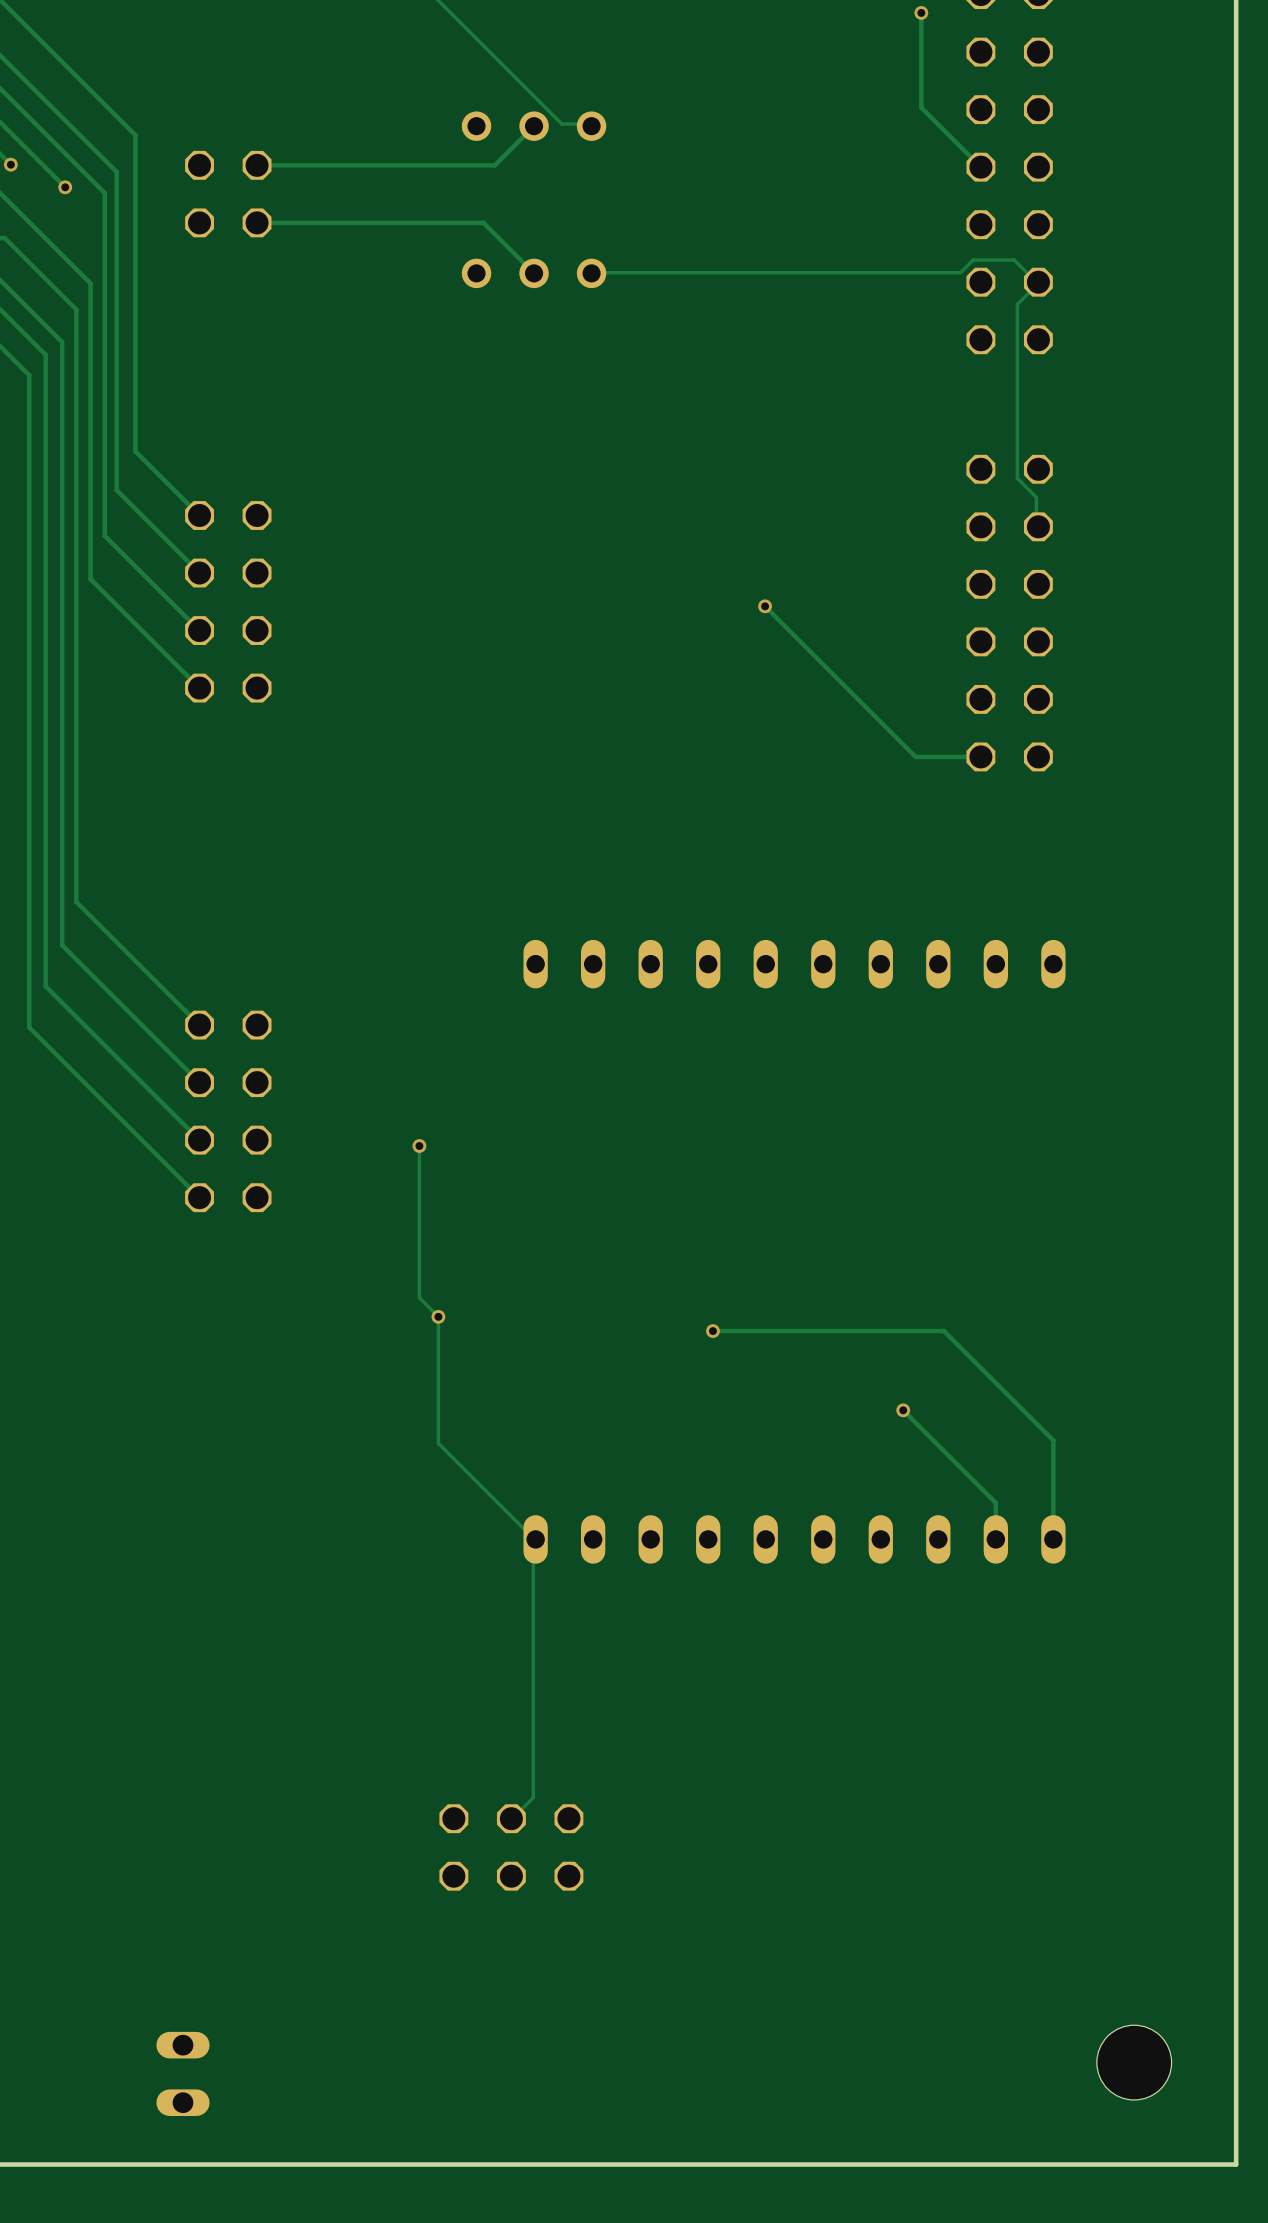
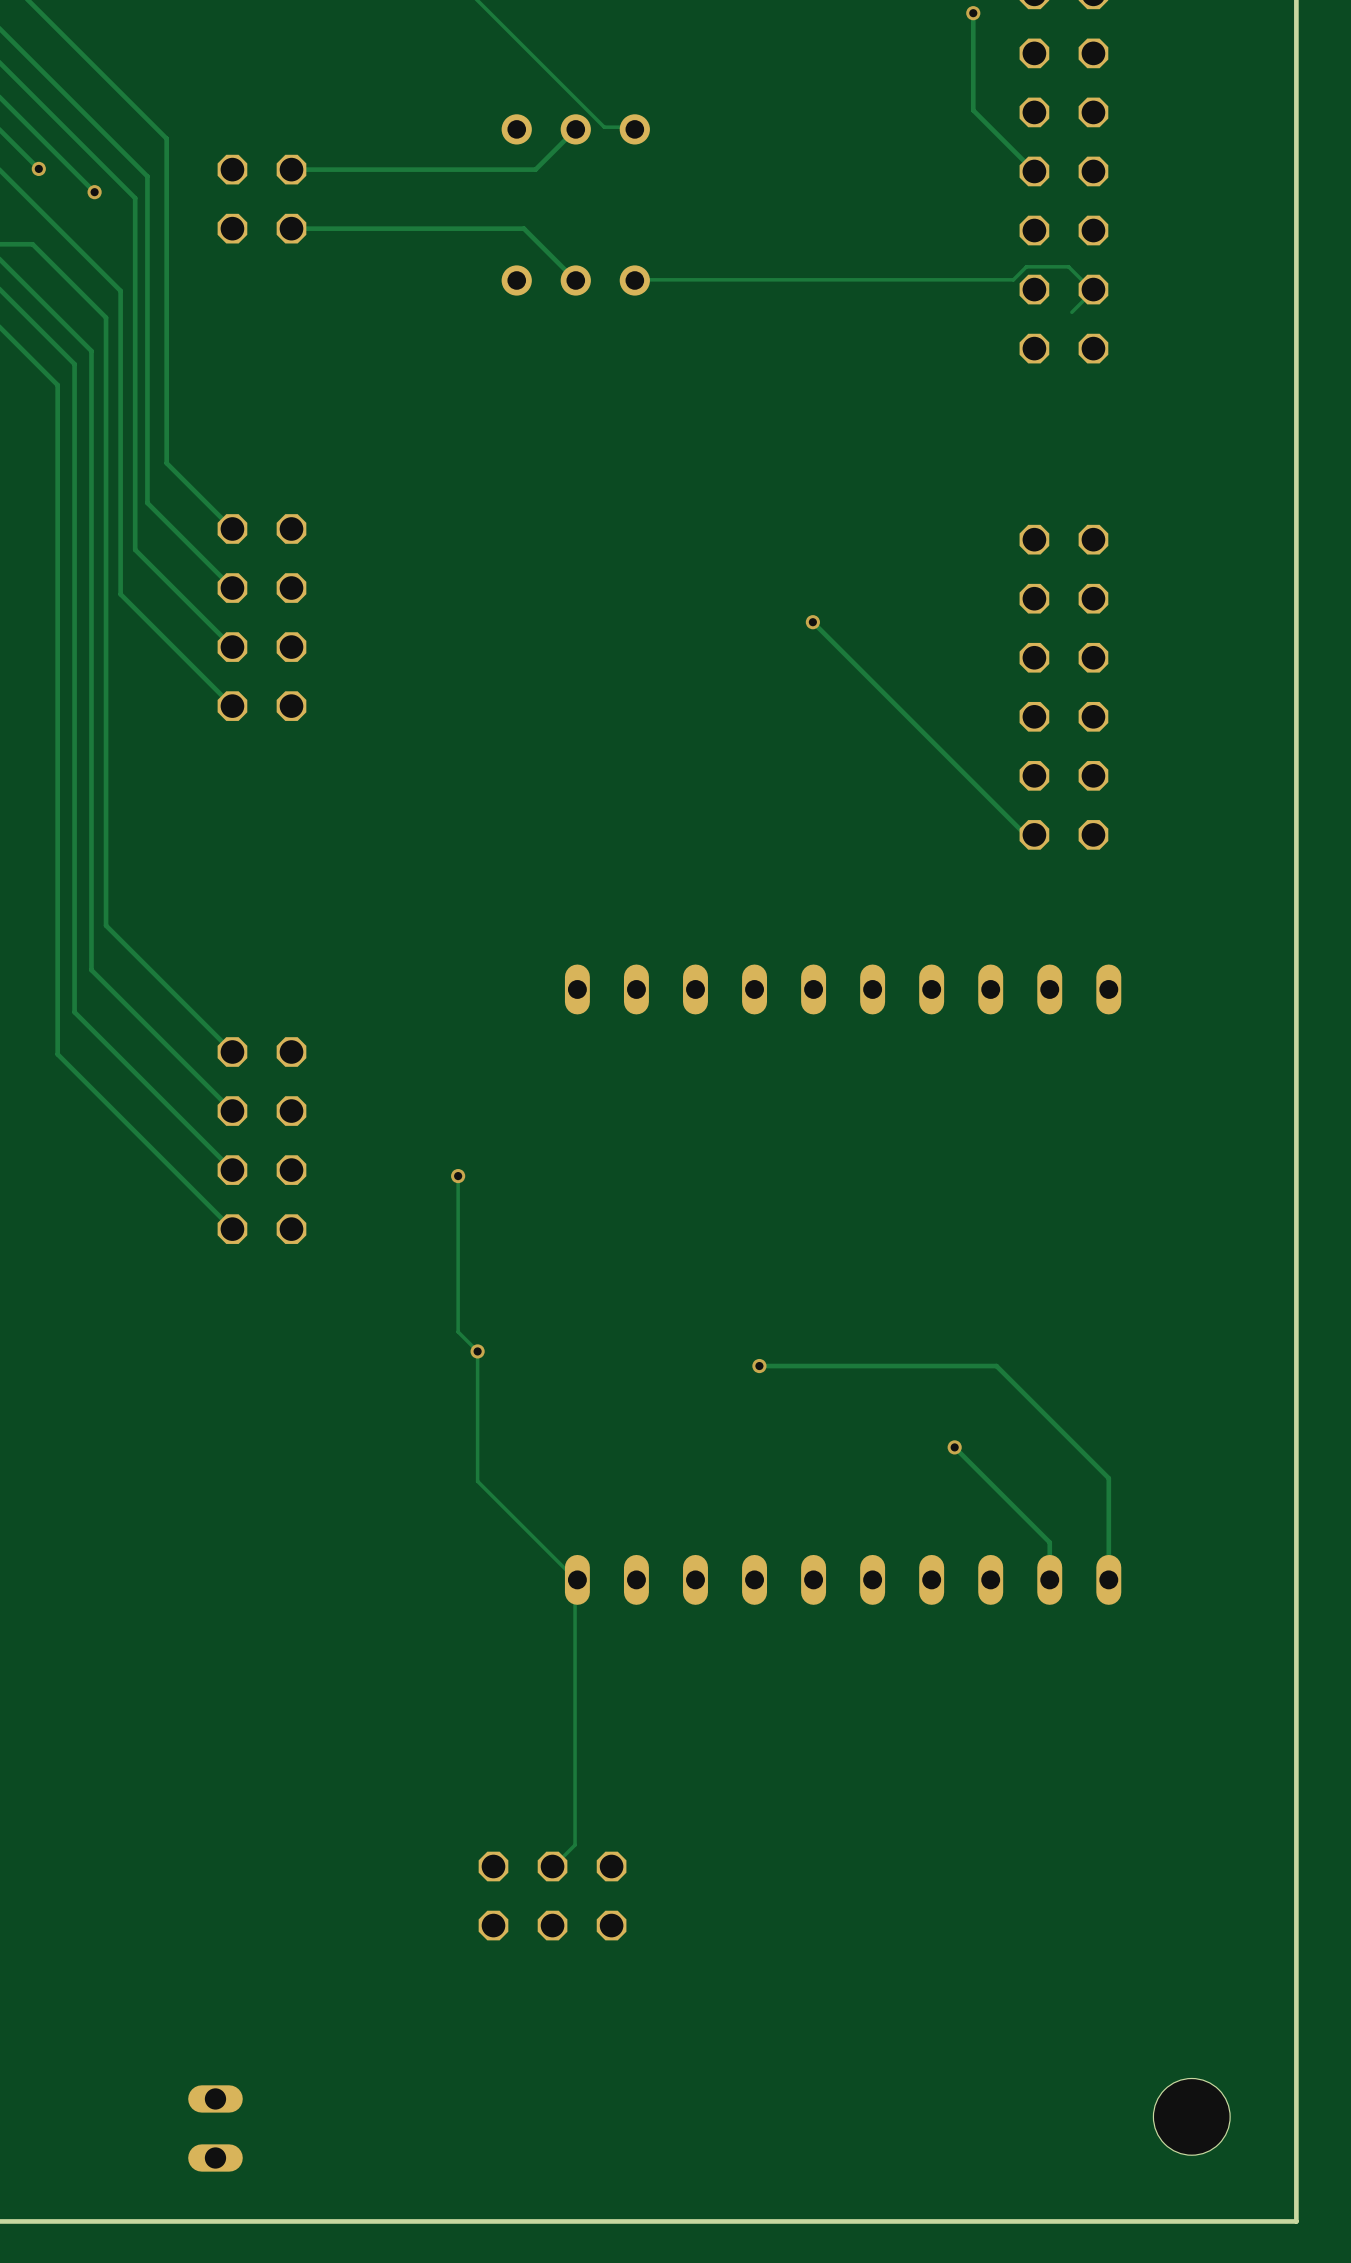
track: (1017, 304) (1017, 478) (1036, 497) (1036, 525) (1038, 526) -> none
part position: (1009, 613) -> (1063, 687)
track: (980, 756) (915, 756) -> (1034, 834) (1025, 834) (967, 776)

